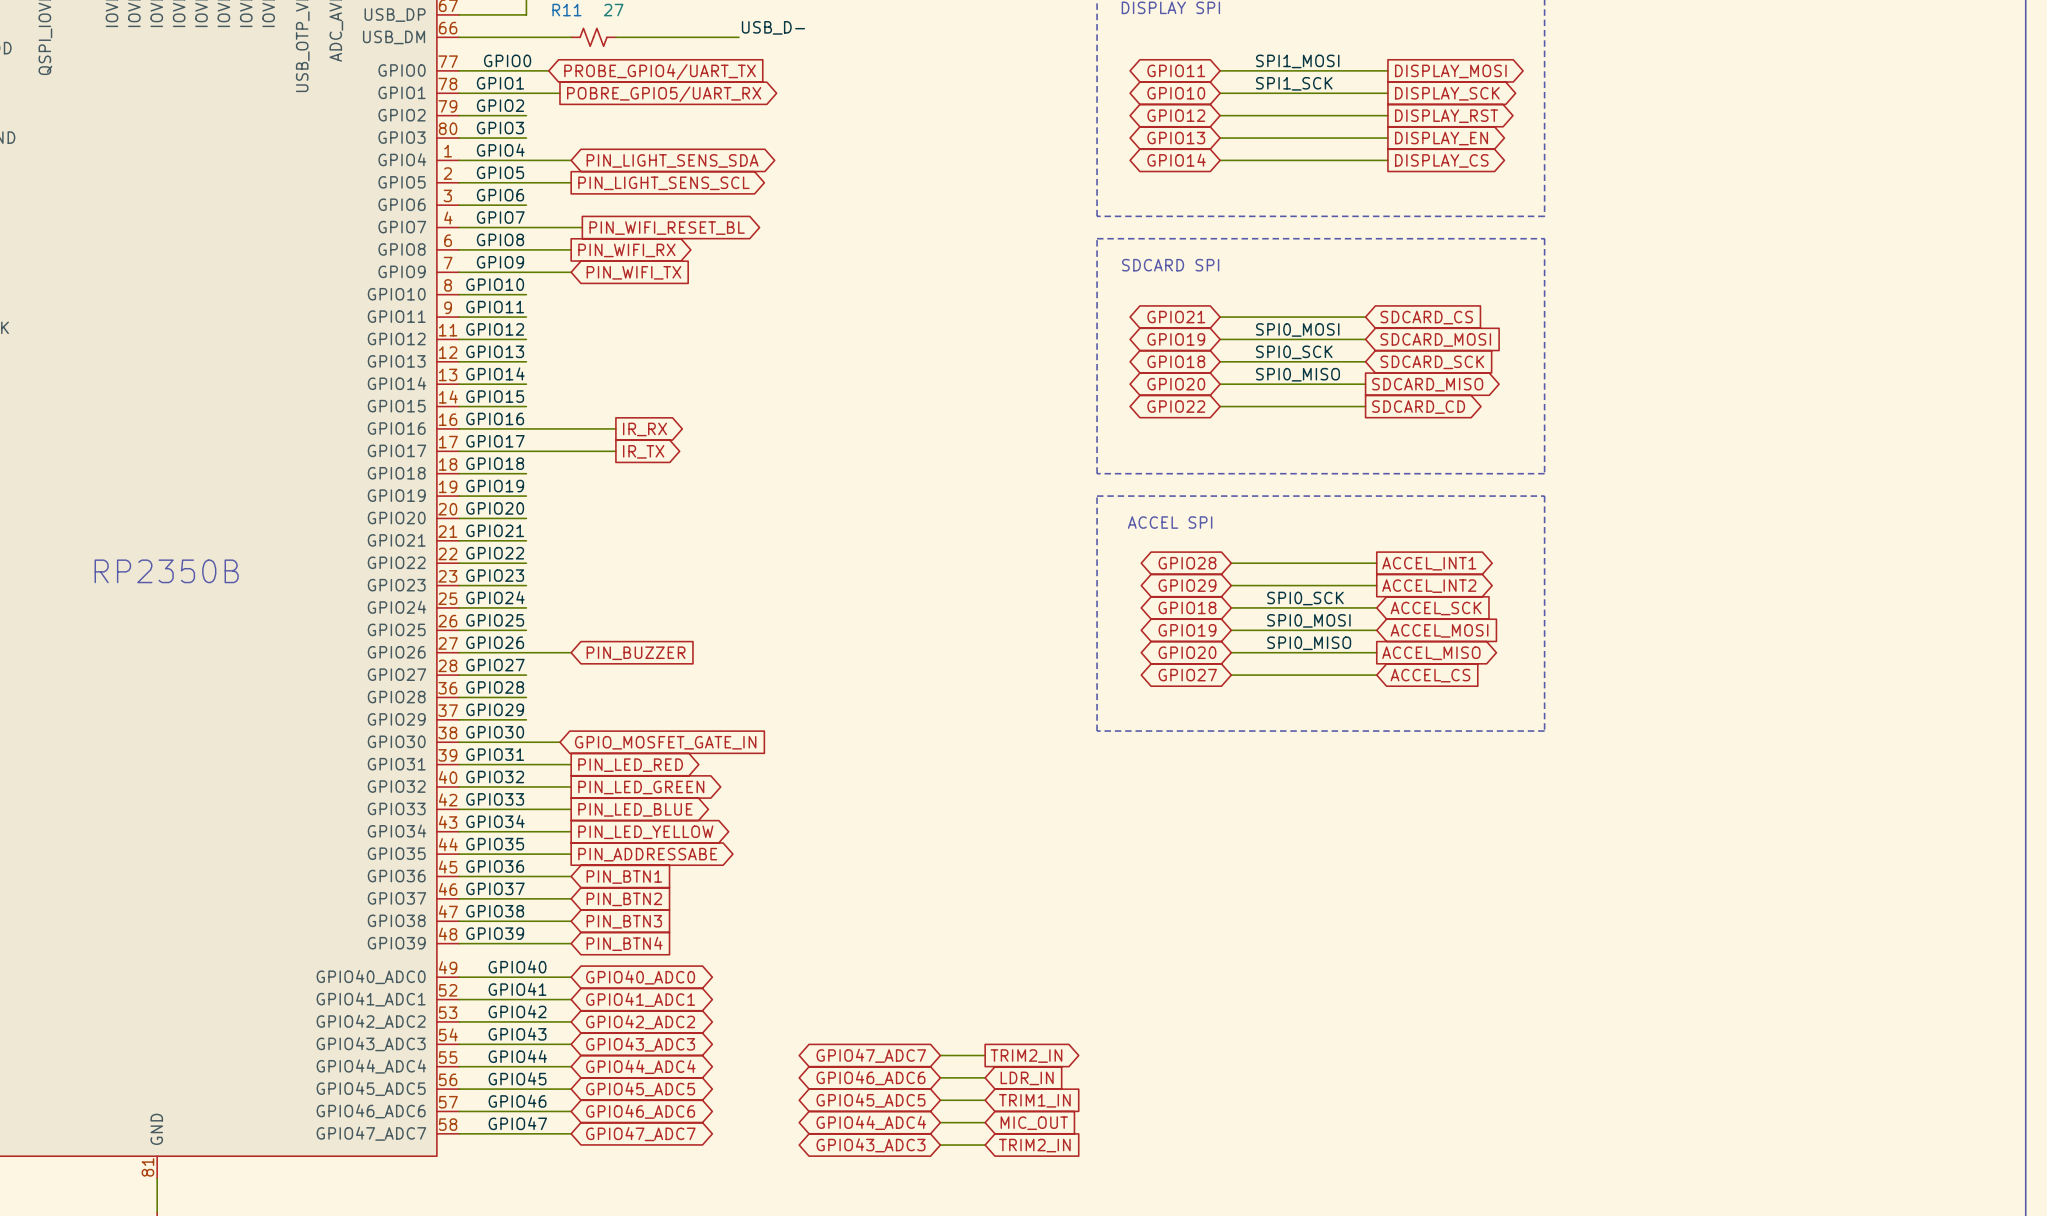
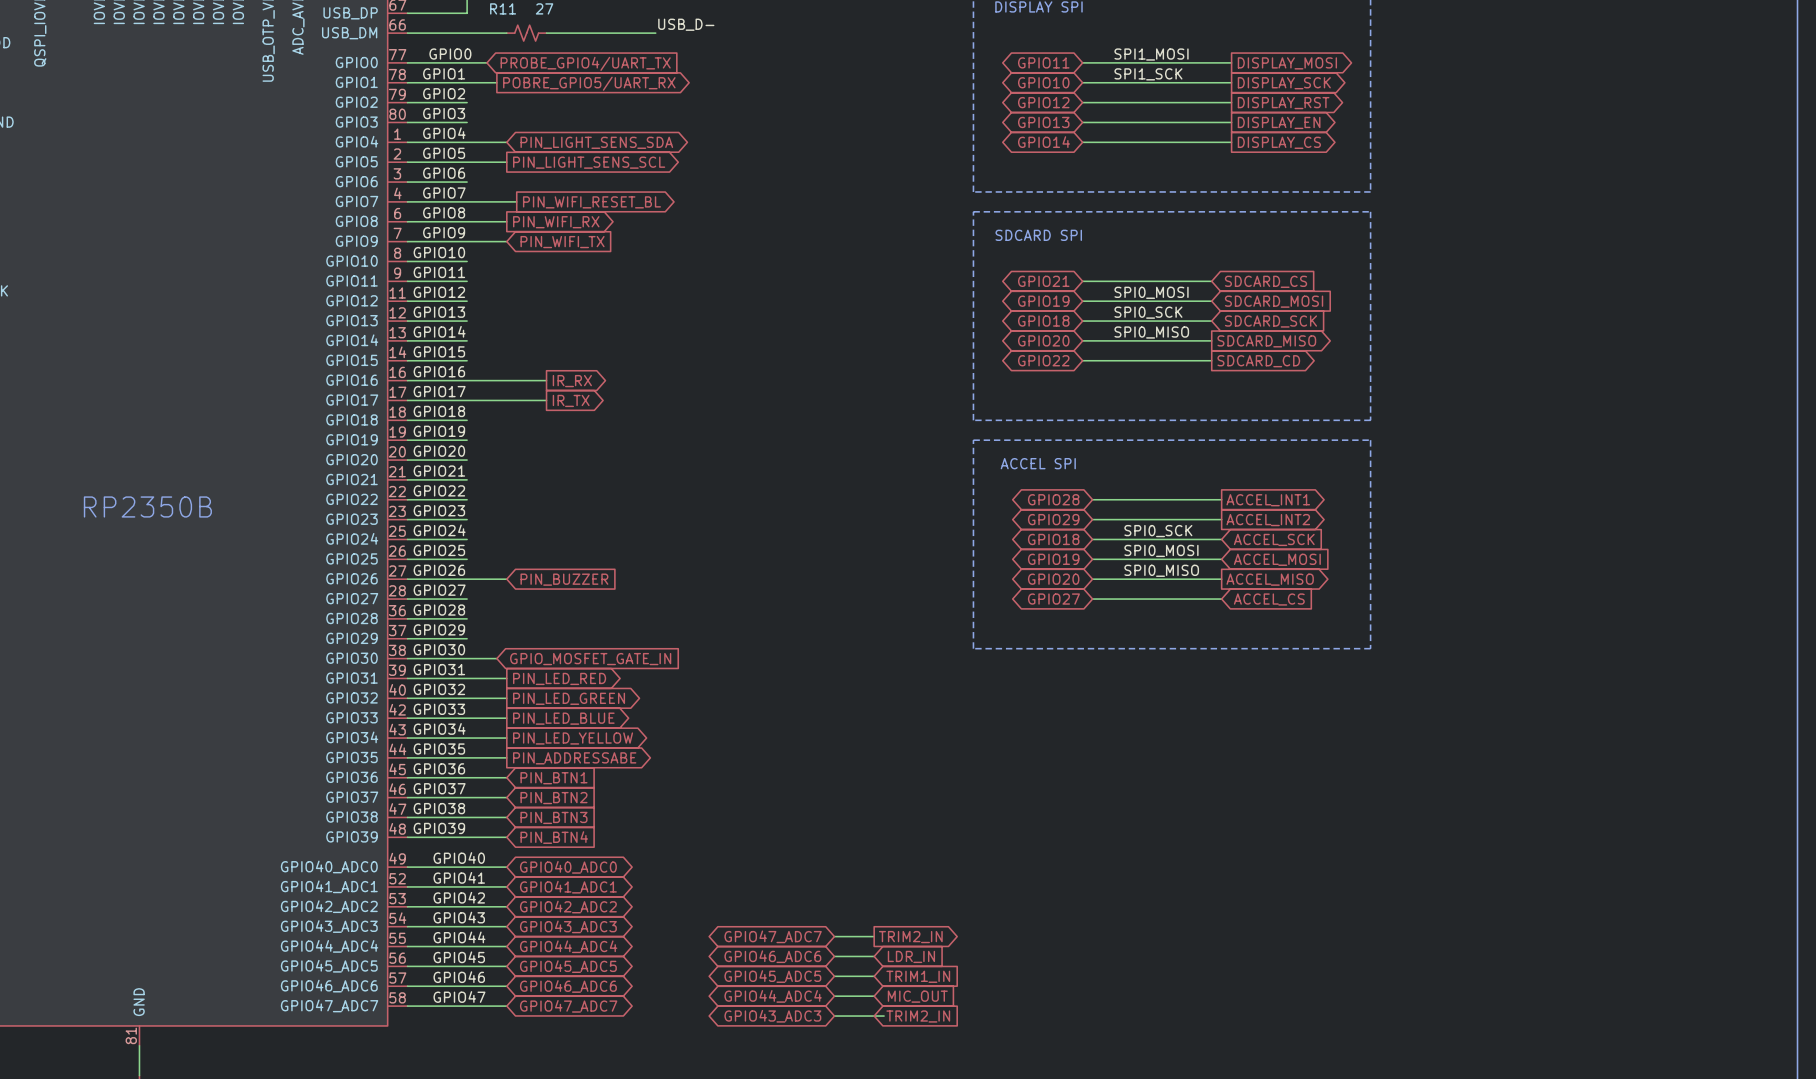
wire: none -> (874, 1016) (884, 1016)

